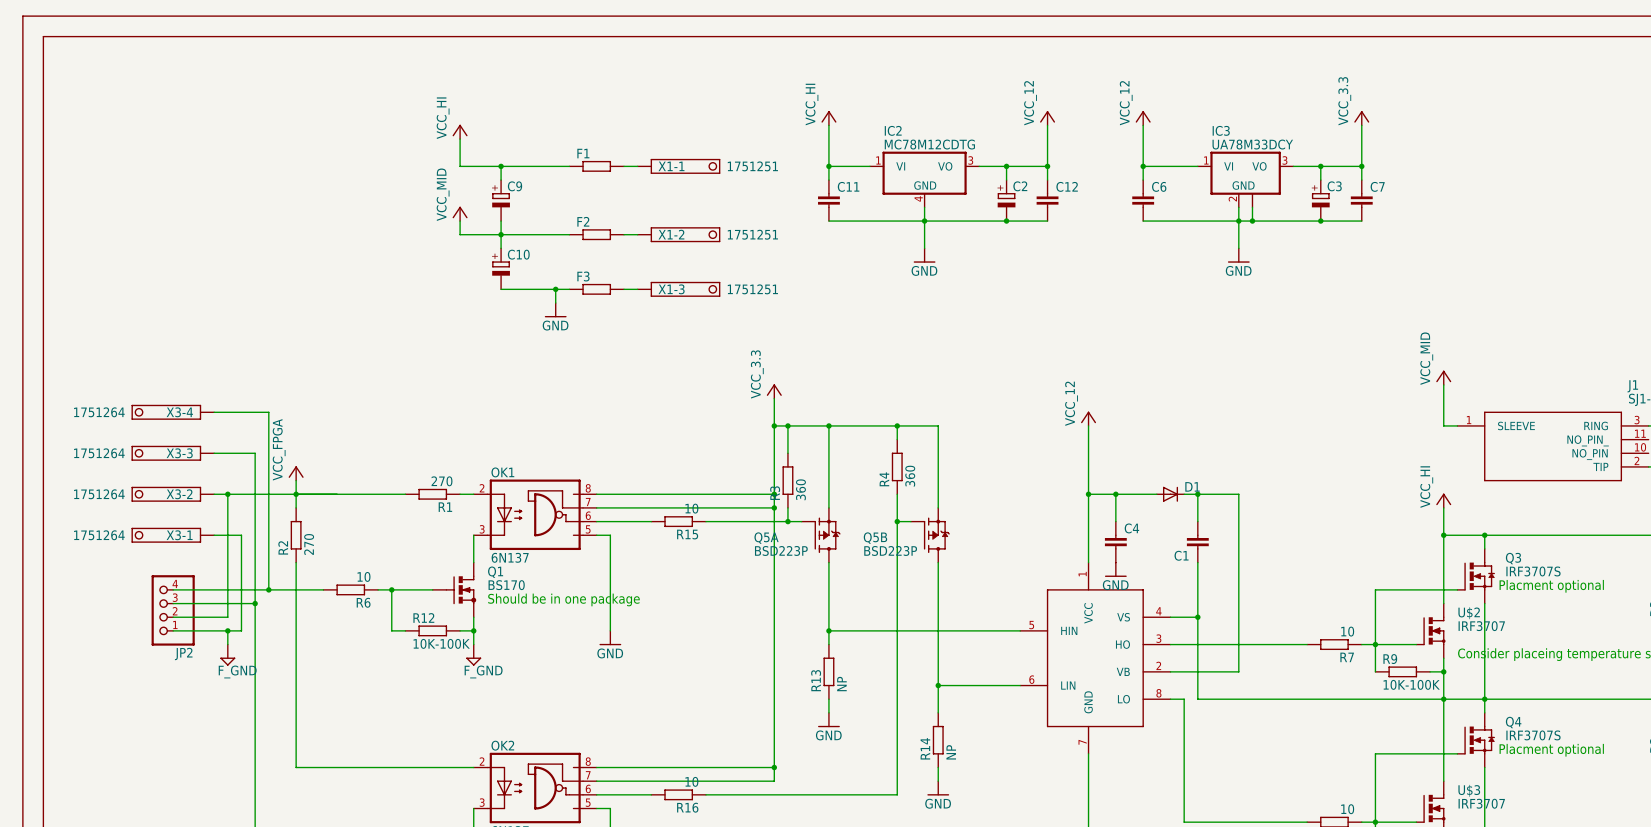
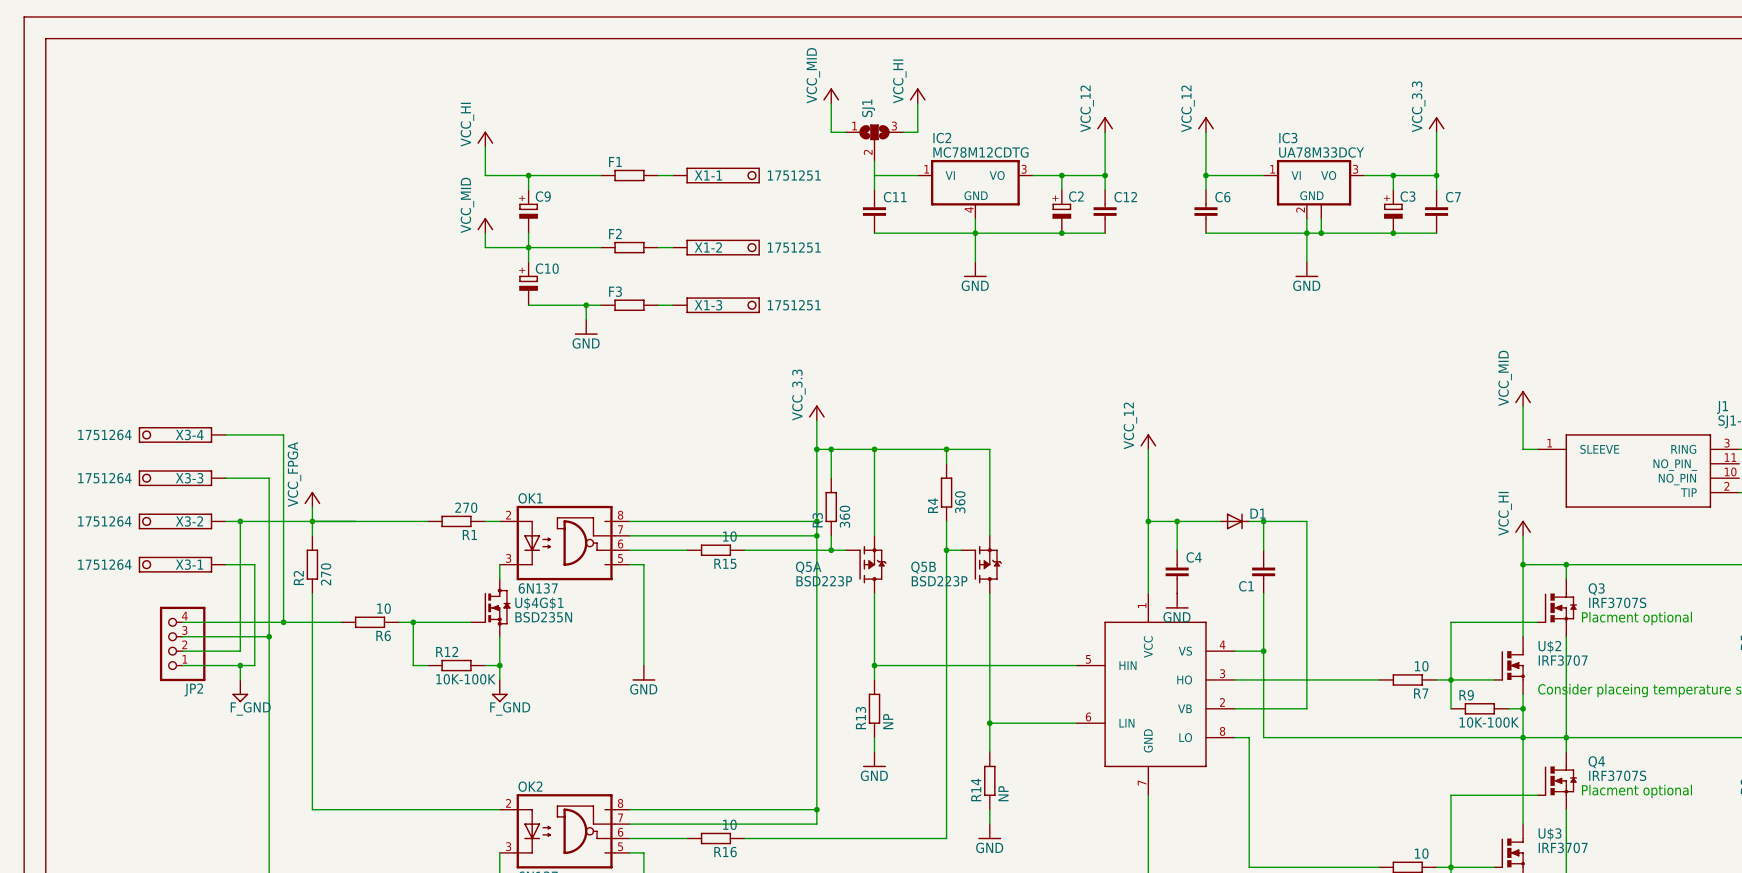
power symbol: none -> VCC_MID (831, 95)
wire: none -> (831, 103) (831, 132) (845, 132)
wire: none -> (917, 103) (917, 132) (903, 132)
power symbol position: VCC_HI (828, 118) -> VCC_HI (917, 95)
SJ1: none -> (874, 142)
junction: (828, 166) -> none
U$4G$1: none -> BSD235N (490, 607)
Q1: BS170 (454, 589) -> none
text: Should be in one package (563, 599) -> none

